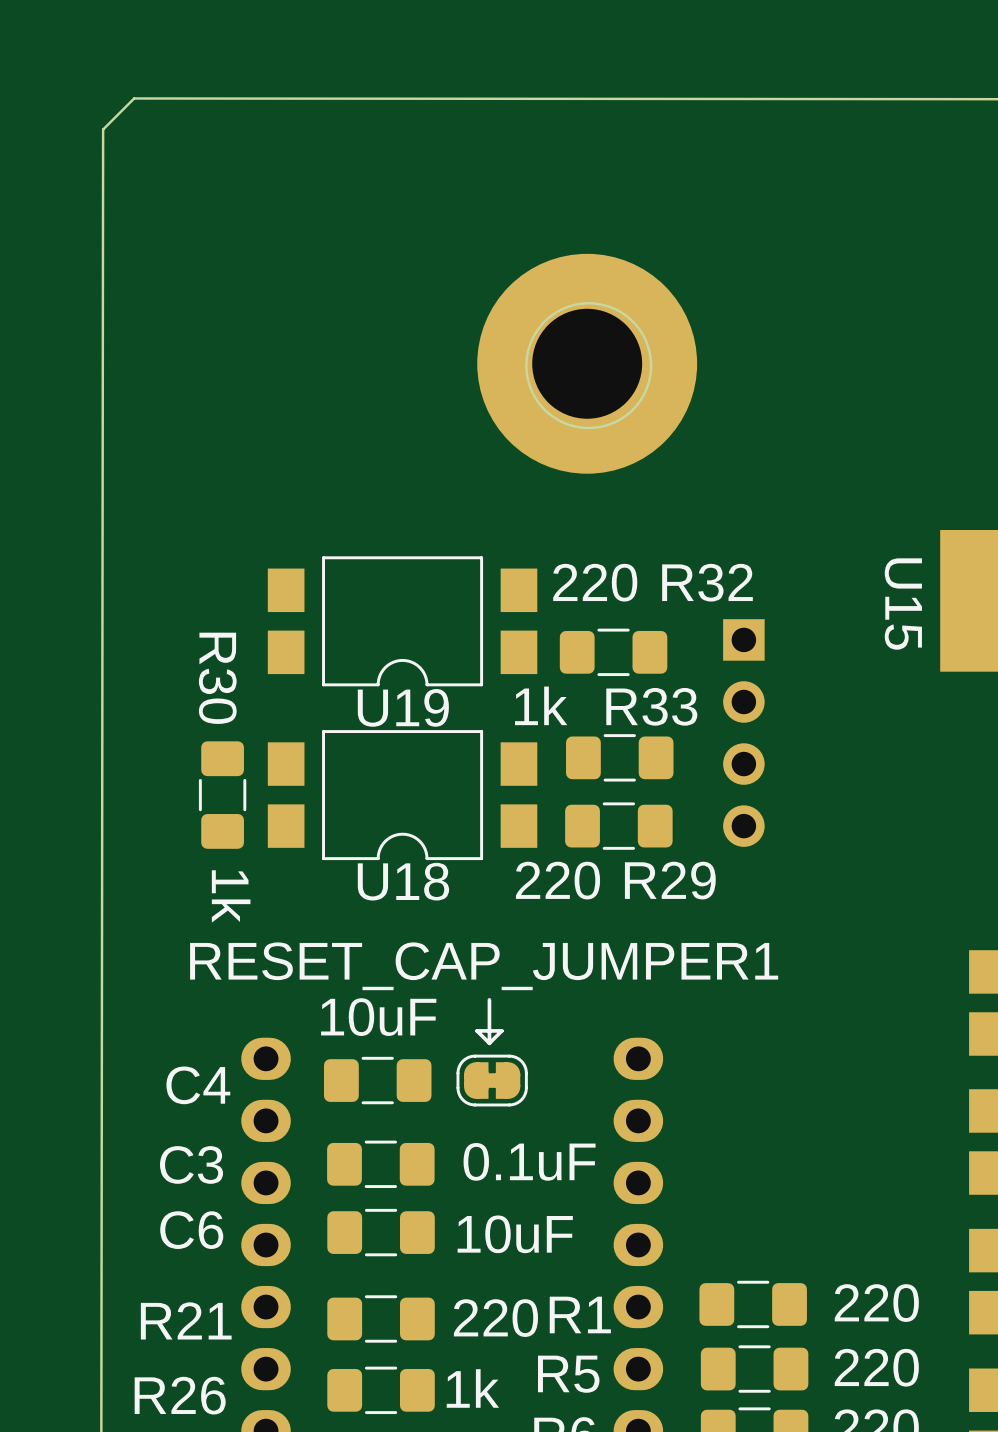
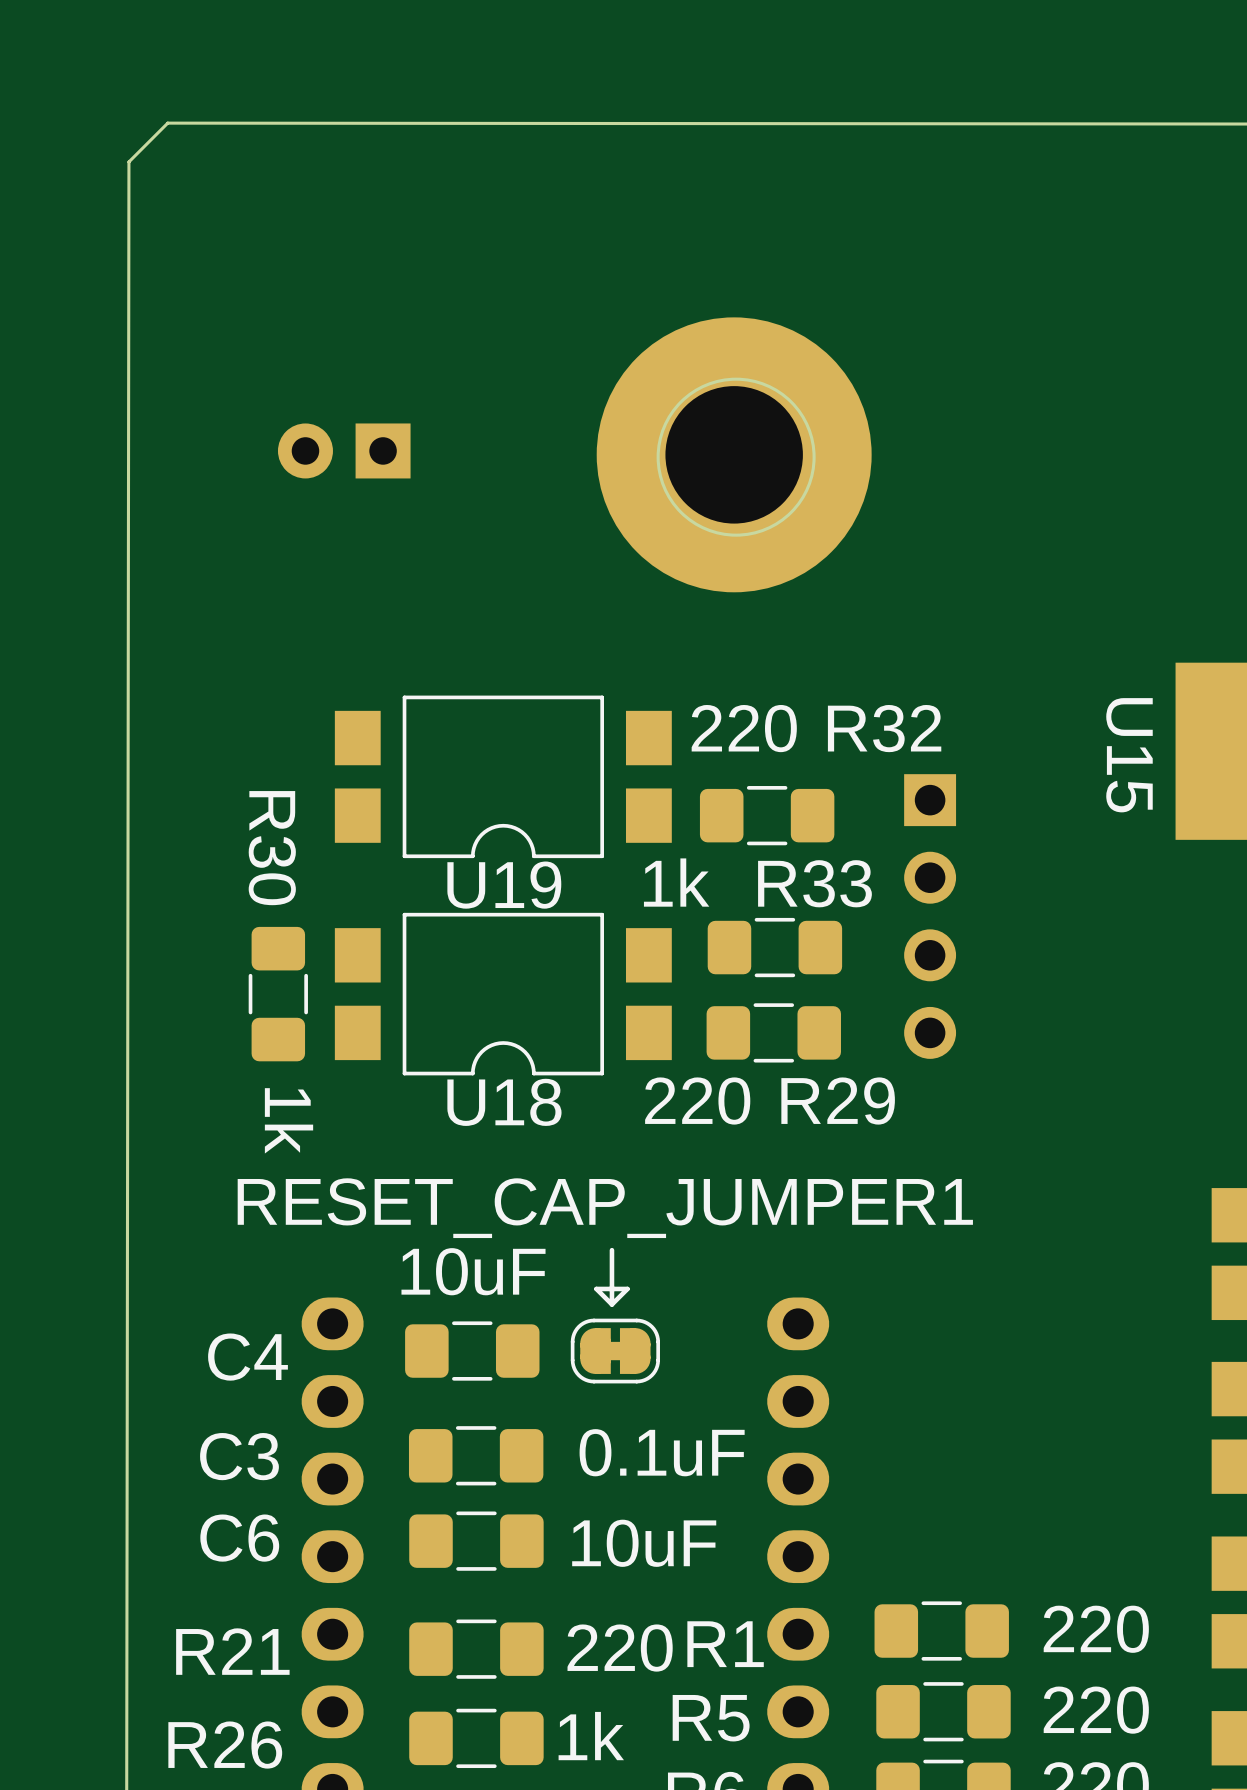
part: none -> (344, 450)

